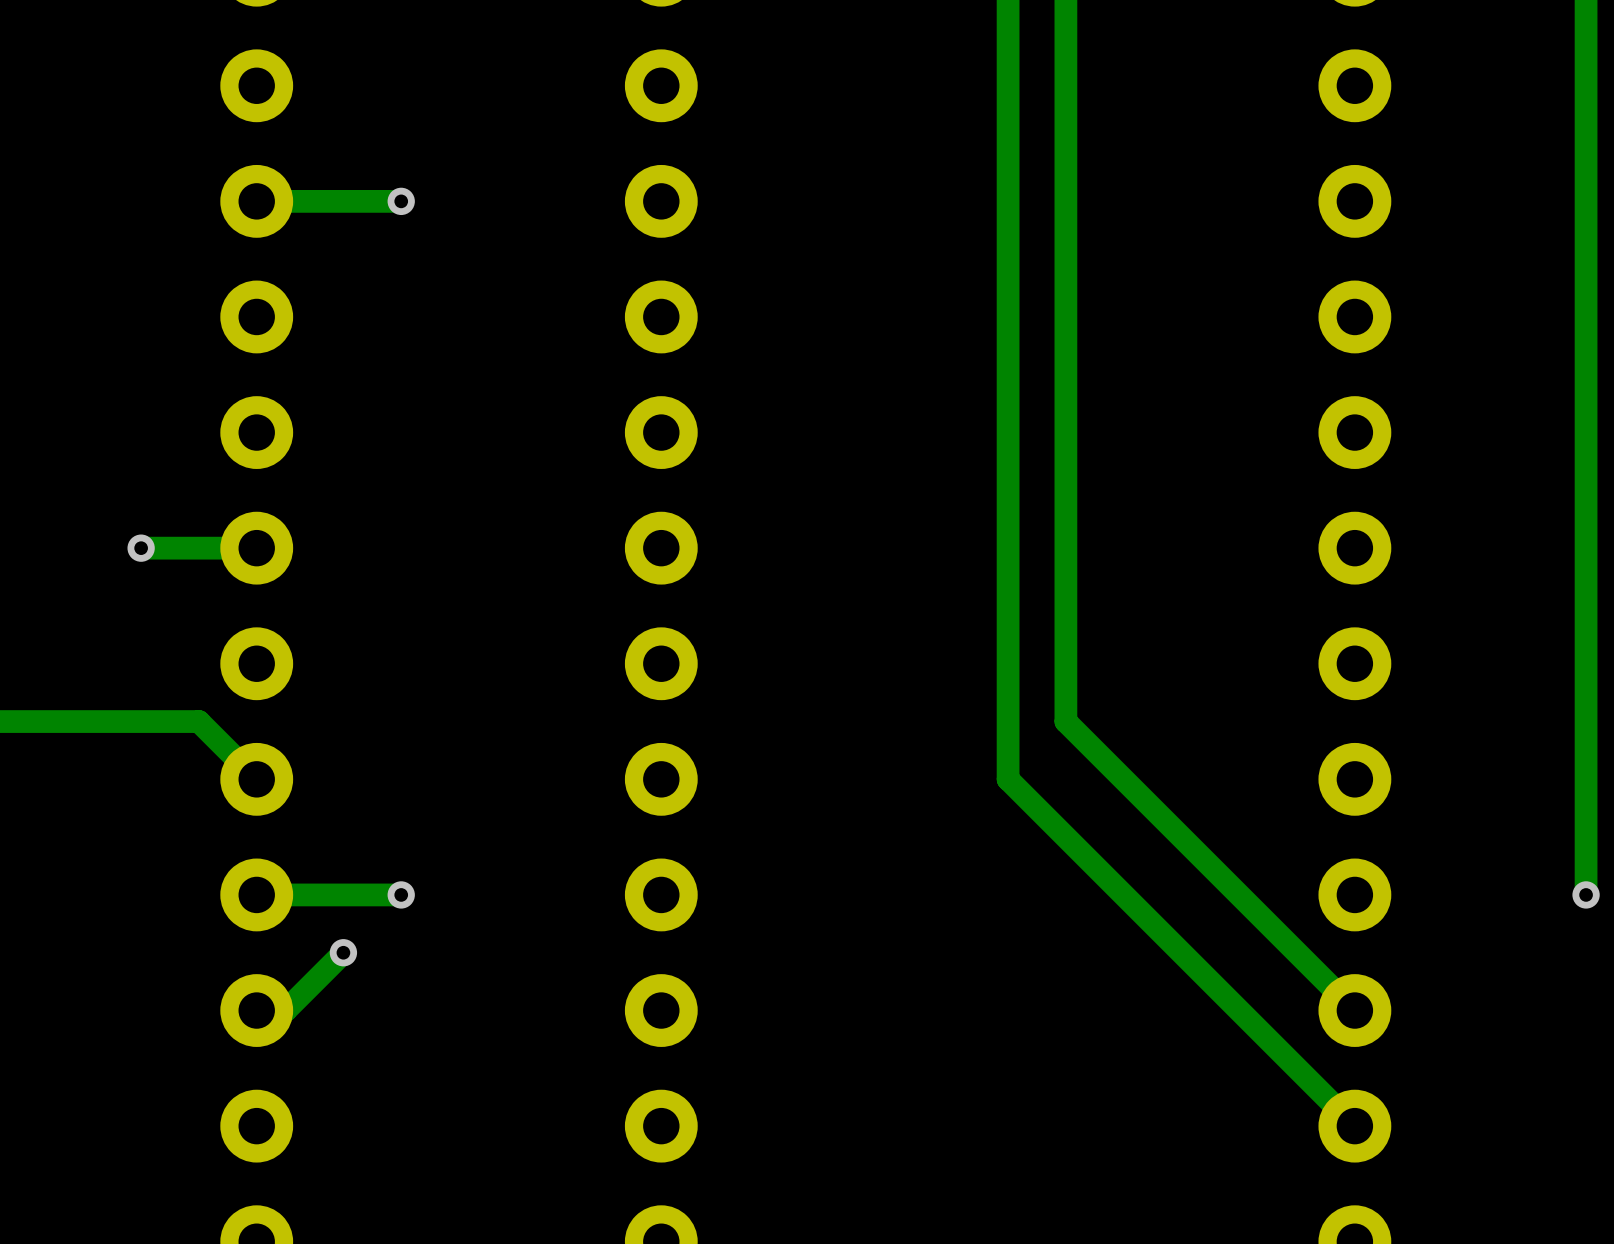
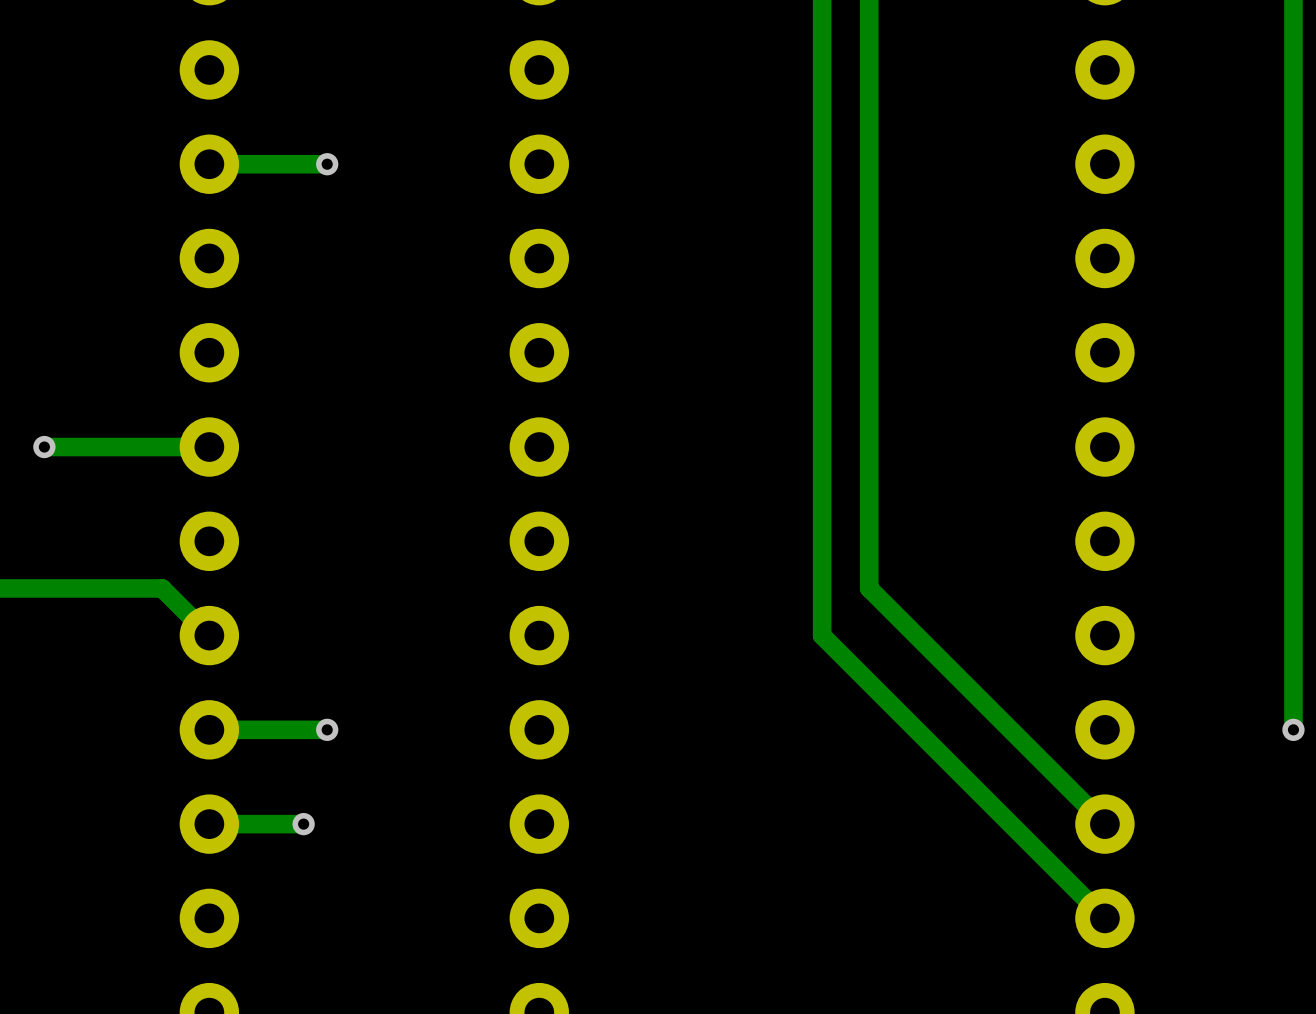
track: none -> (115, 447) (44, 447)
via position: (141, 548) -> (44, 447)
track: (343, 952) (285, 1010) -> (303, 824) (232, 824)
via position: (343, 952) -> (303, 824)

